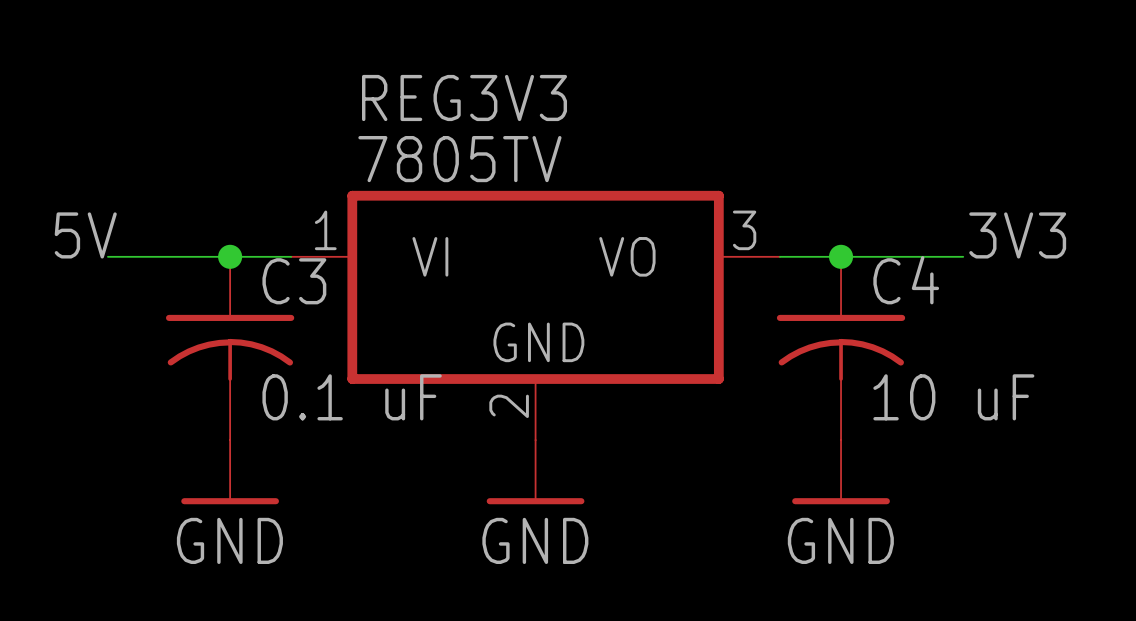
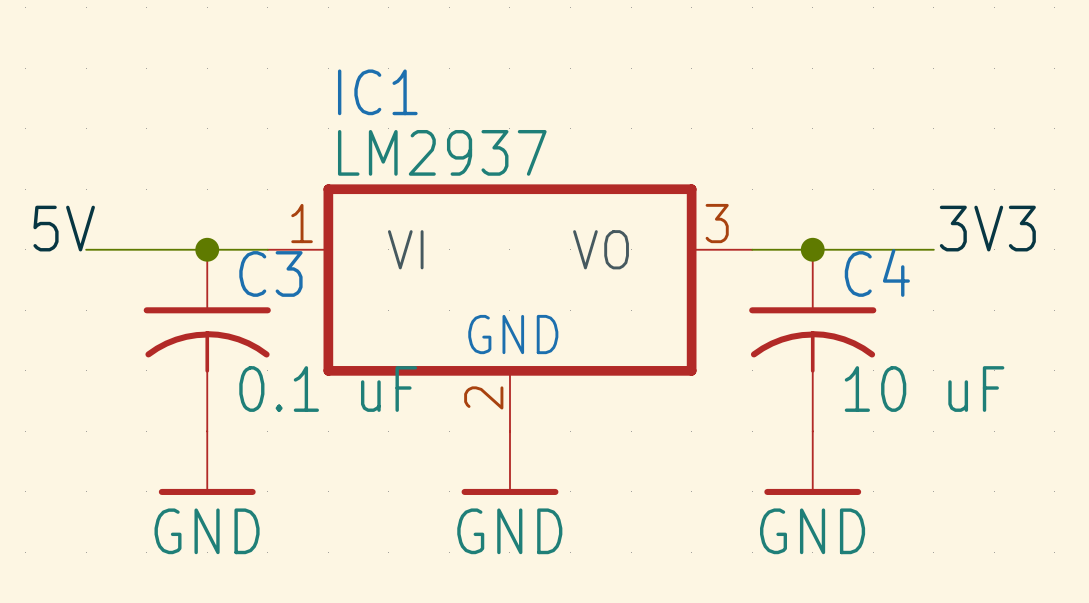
REG3V3 name: REG3V3 (464, 97) -> IC1 (377, 92)
REG3V3 value: 7805TV (459, 159) -> LM2937 (442, 152)

